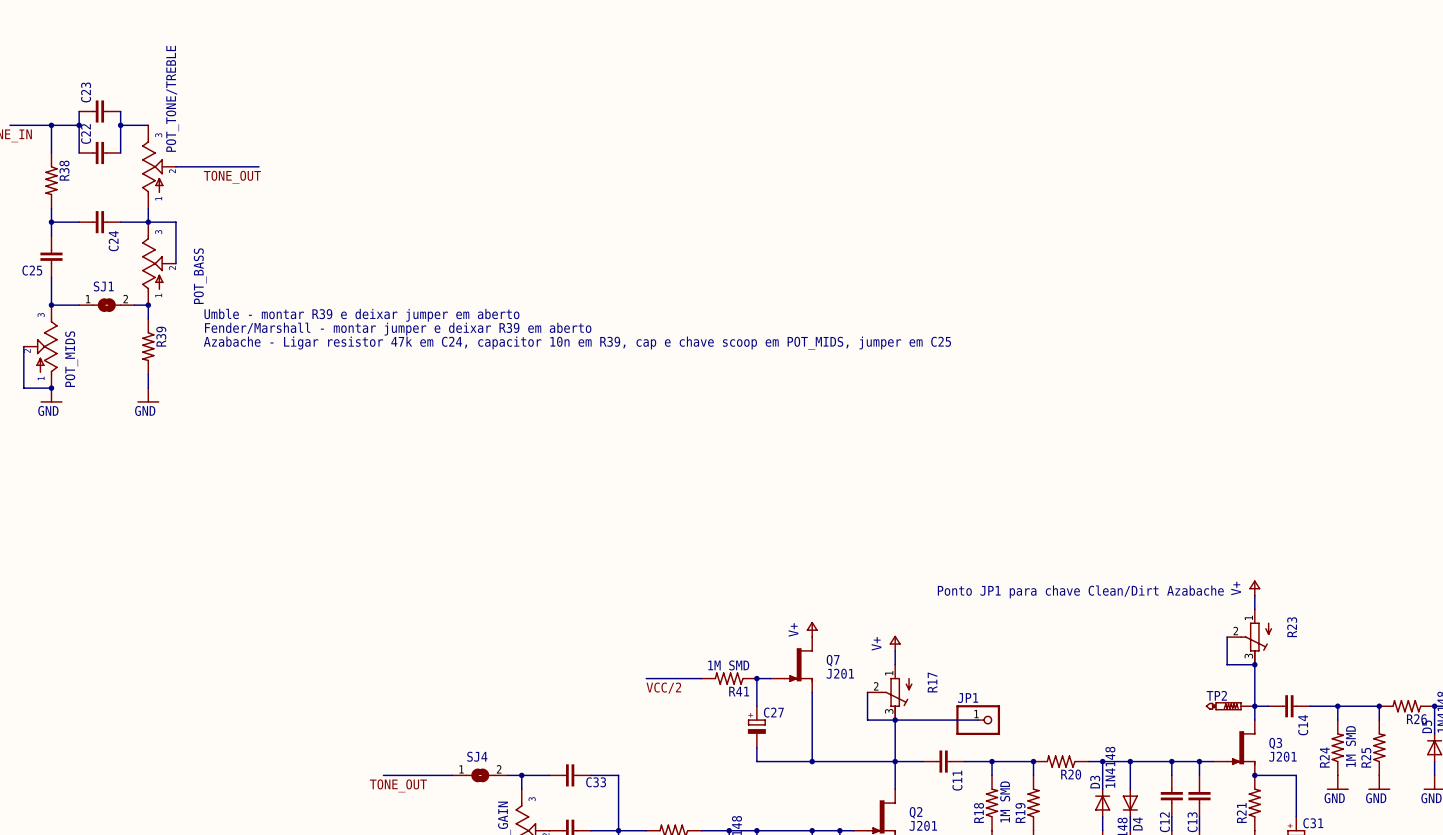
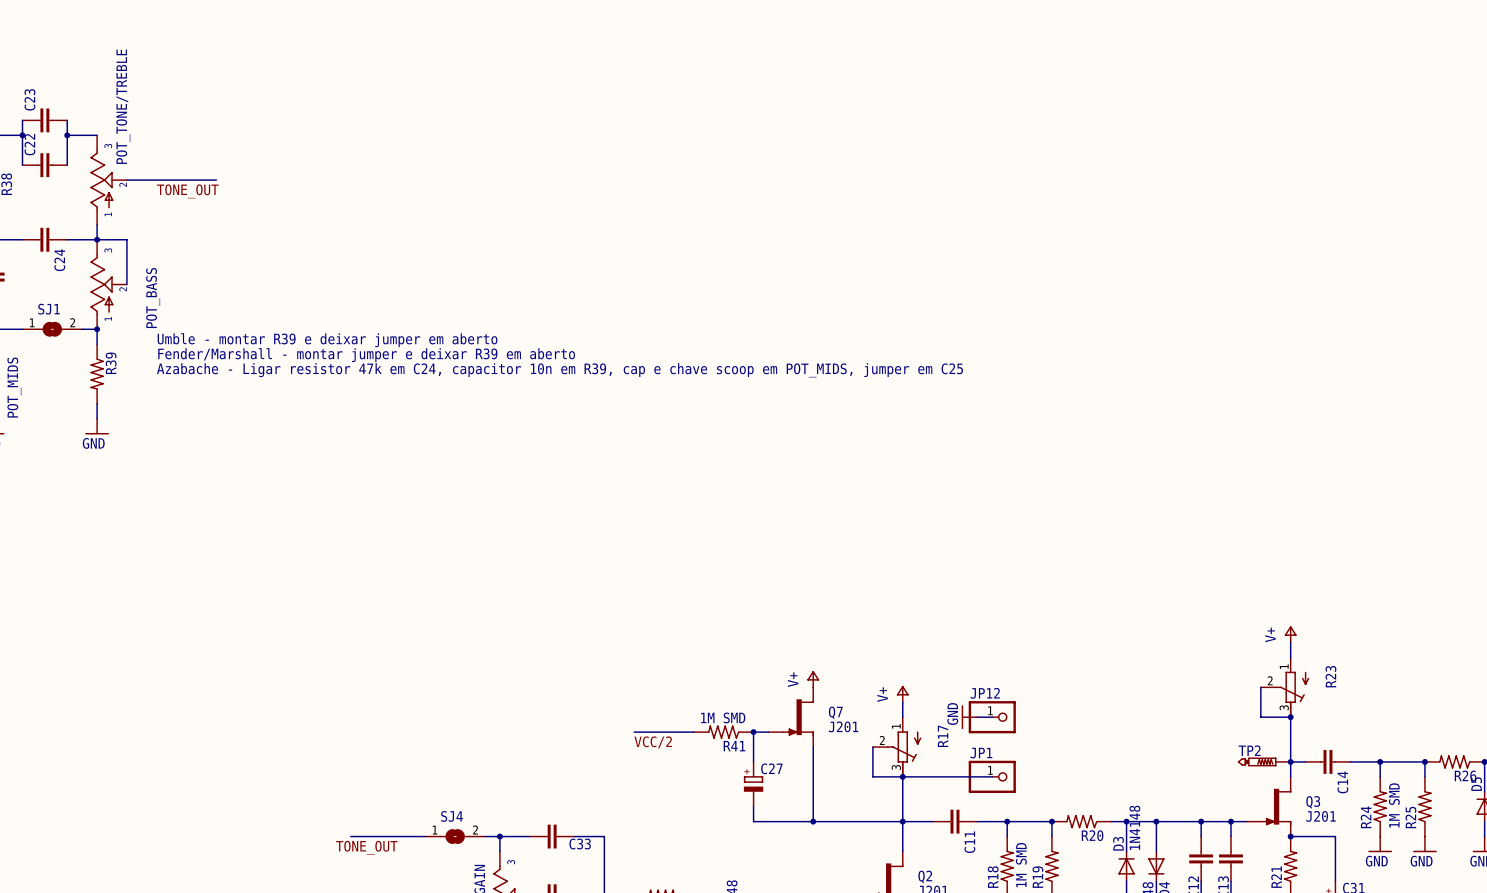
text: Ponto JP1 para chave Clean/Dirt Azabache (1080, 591) -> none
power symbol: none -> GND (969, 717)
wire: none -> (977, 717) (992, 717)
JP12: none -> (992, 717)

